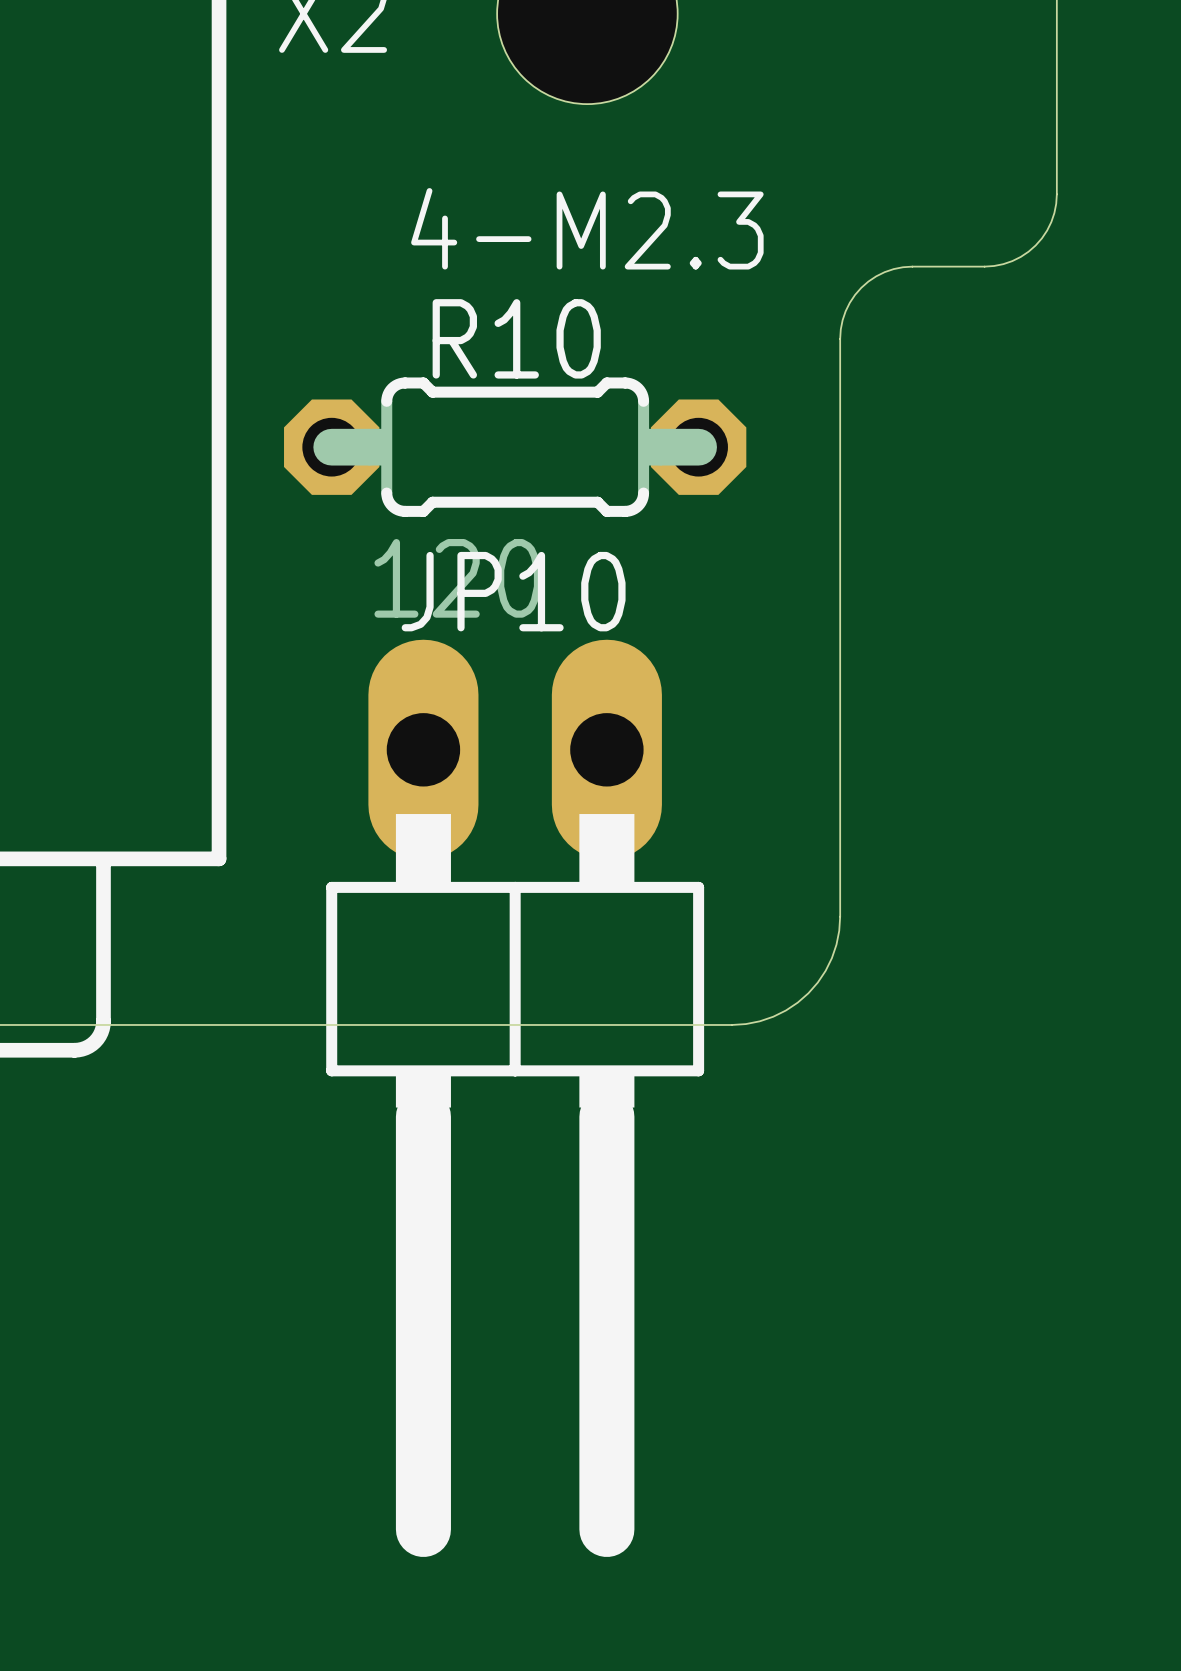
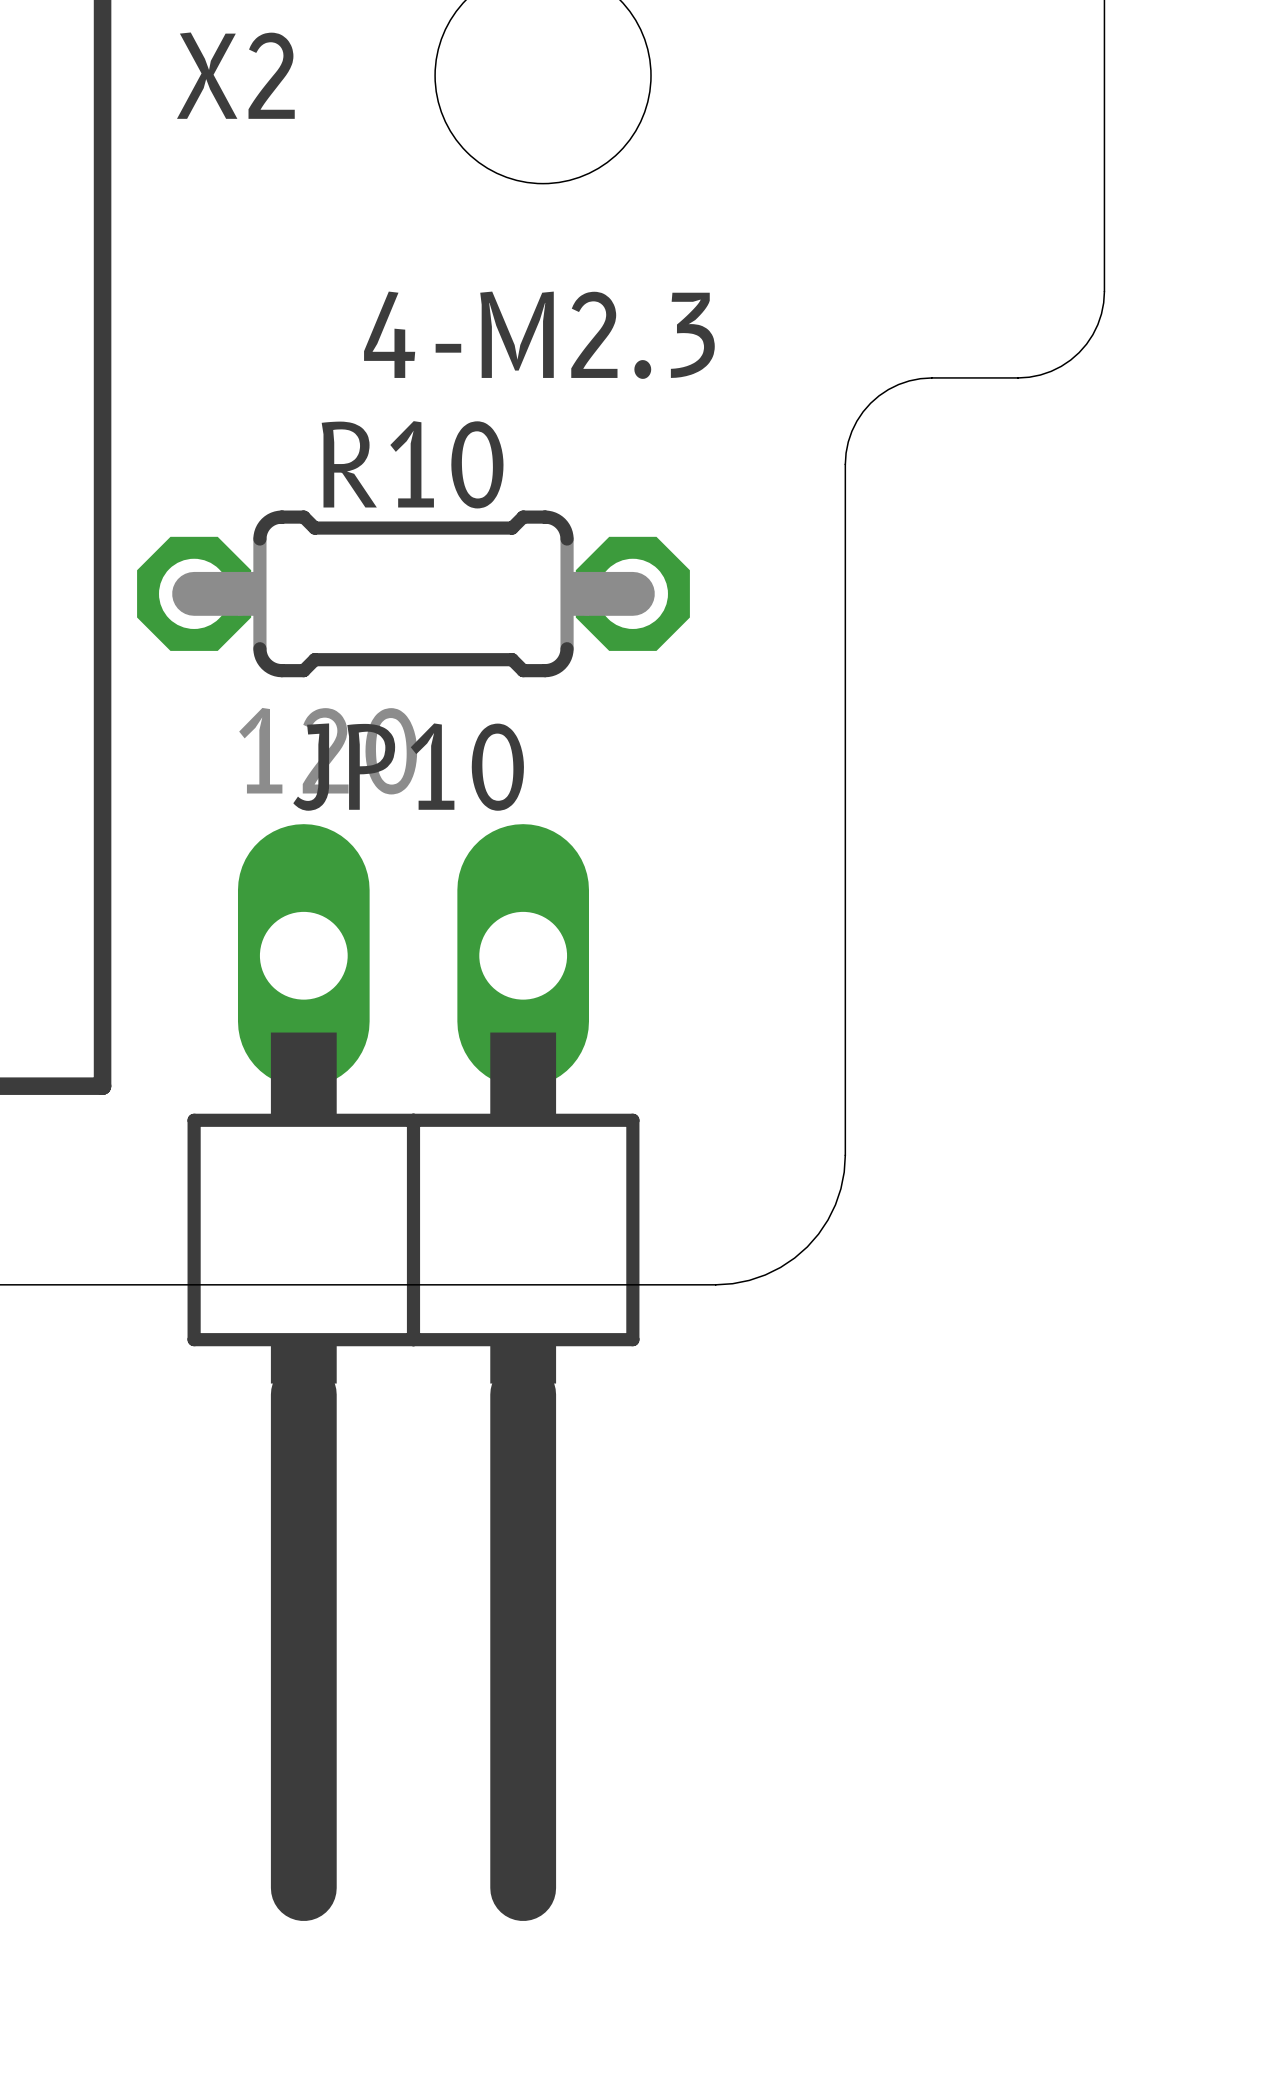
R10 position: (515, 447) -> (413, 593)
JP10 position: (515, 1098) -> (413, 1372)

